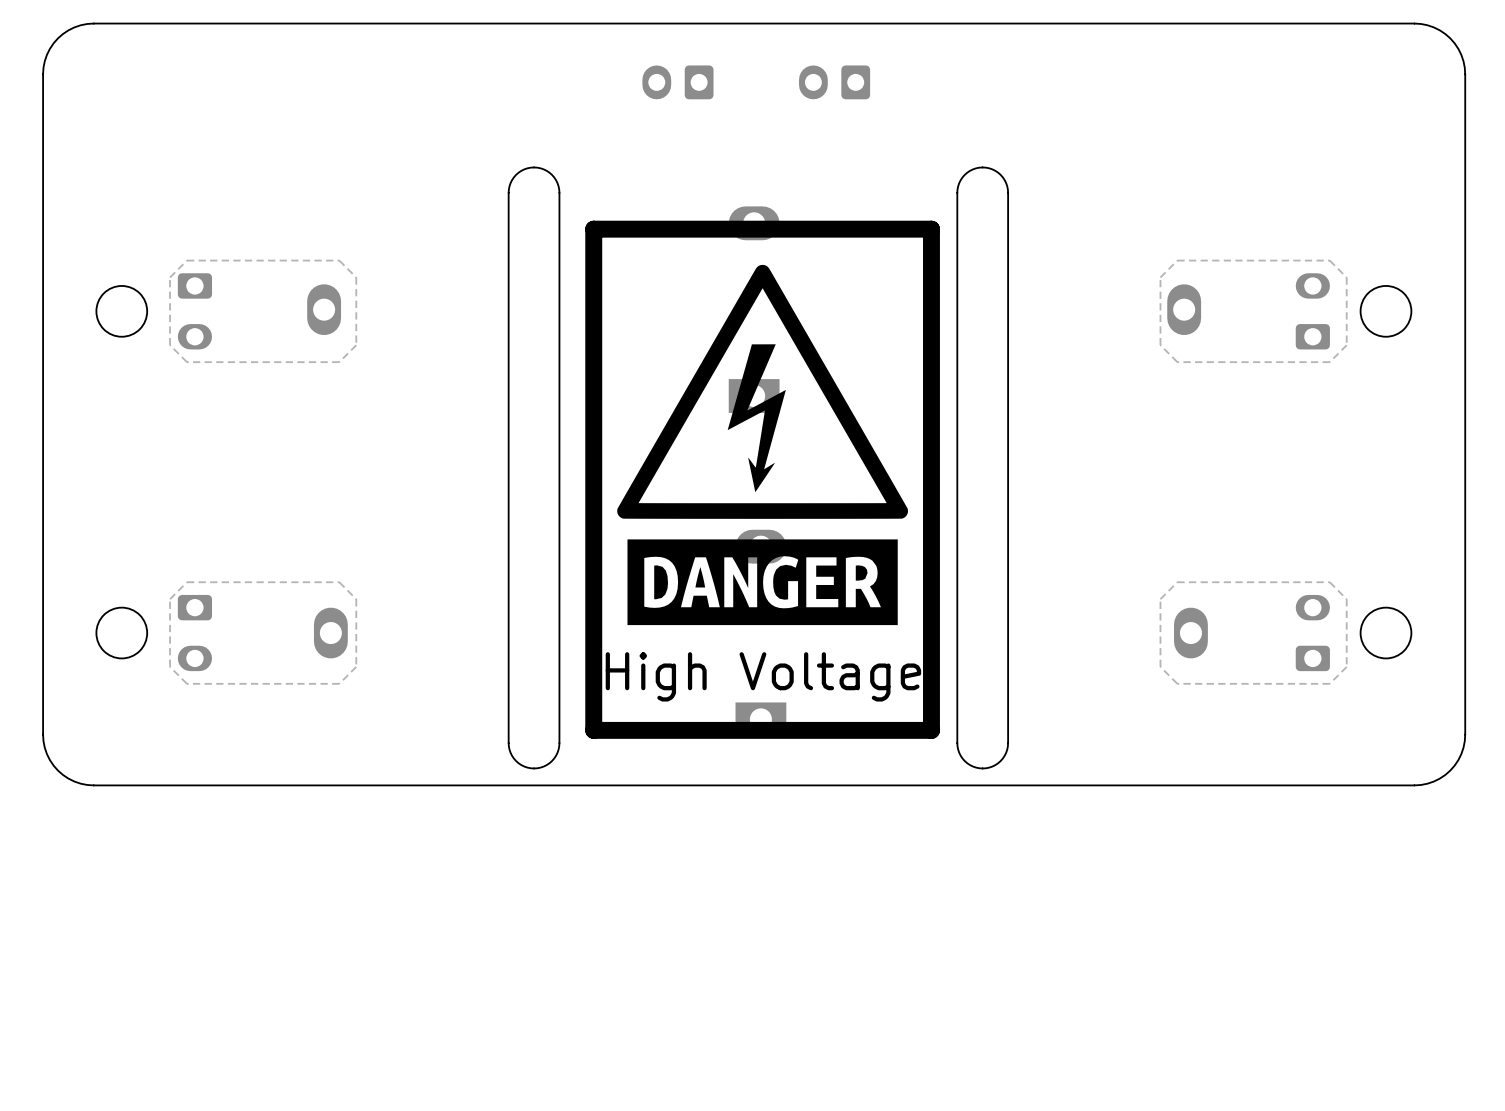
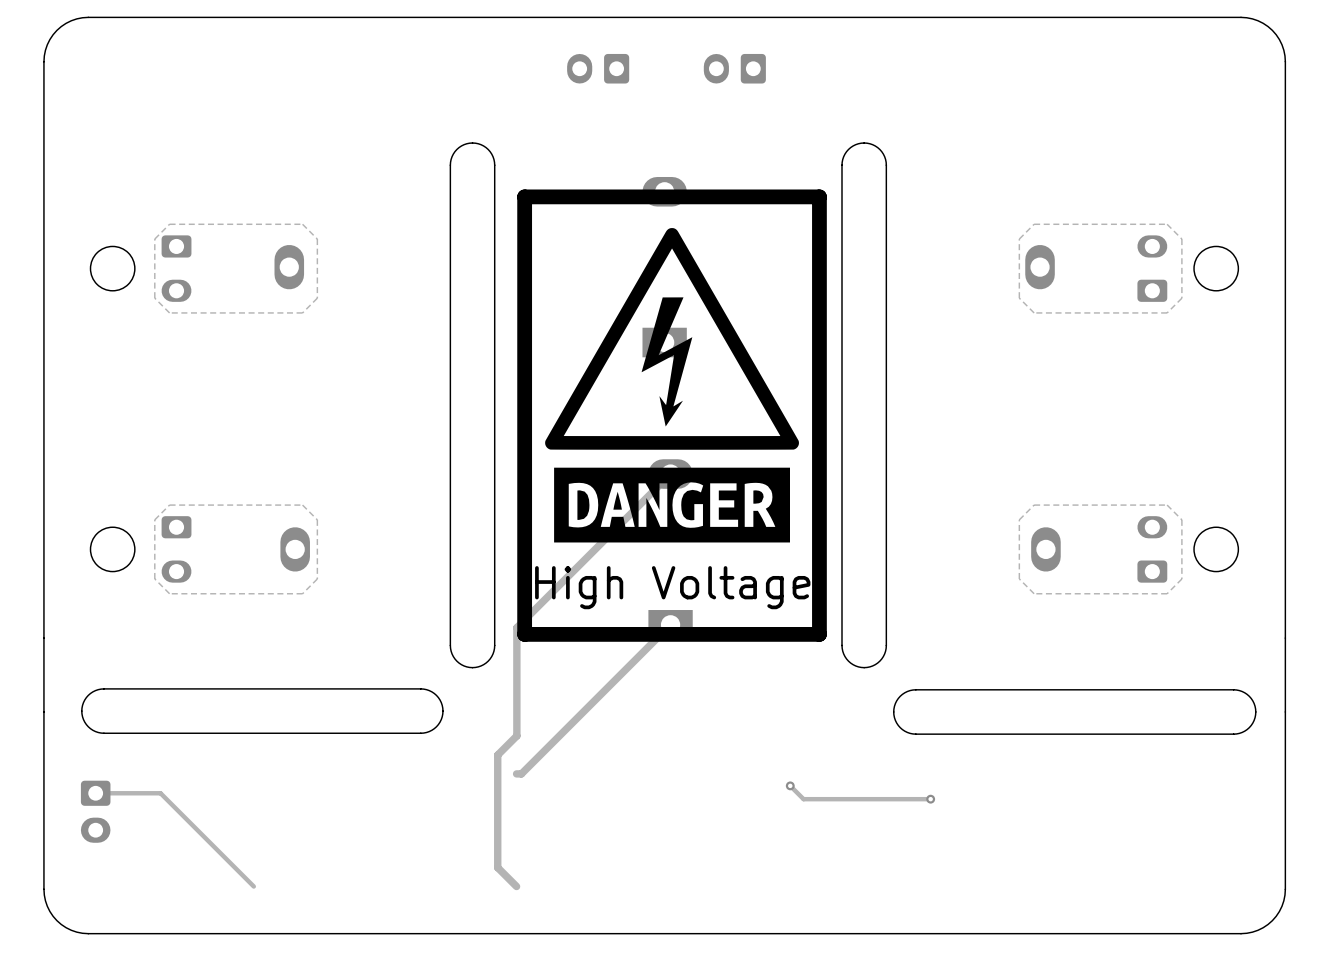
track: none -> (670, 474) (516, 627) (516, 735) (497, 755) (497, 867) (516, 886)
track: none -> (670, 624) (521, 773) (516, 773)
board edge: (1465, 734) (1461, 754) (1450, 770) (1433, 781) (1414, 785) (93, 785) (74, 781) (57, 770) (46, 754) (43, 734) -> (1285, 638) (1284, 895) (1279, 911) (1272, 920) (1257, 930) (1241, 933) (76, 932) (66, 927) (53, 916) (47, 906) (44, 895) (43, 638)
board edge: none -> (420, 688) (101, 689) (92, 691) (86, 697) (82, 705) (81, 713) (88, 726) (95, 731) (103, 733) (423, 733) (431, 730) (438, 724) (442, 711) (441, 702) (436, 695) (429, 690) (420, 688)
board edge: none -> (1233, 689) (913, 690) (904, 692) (898, 698) (894, 706) (893, 714) (900, 727) (907, 732) (915, 734) (1236, 733) (1244, 731) (1251, 725) (1255, 711) (1254, 703) (1249, 696) (1242, 691) (1233, 689)
track: none -> (790, 785) (803, 799) (930, 799)
via: none -> (790, 785)
track: none -> (95, 793) (160, 793) (253, 886)
via: none -> (930, 799)
part: none -> (95, 811)

